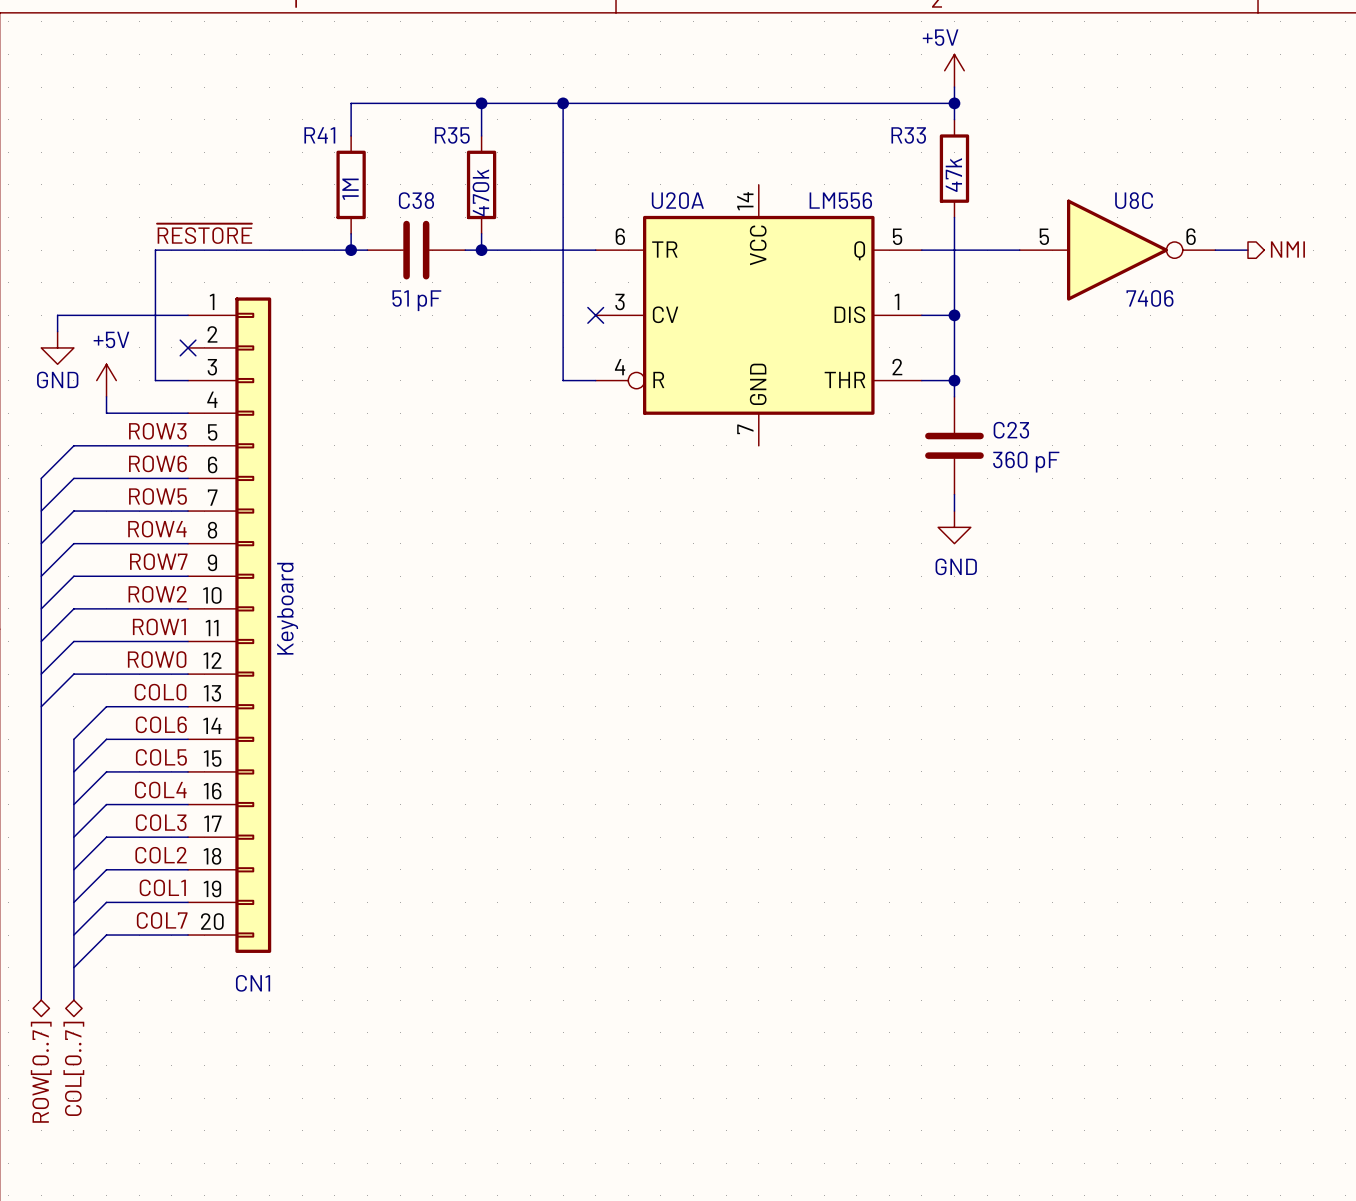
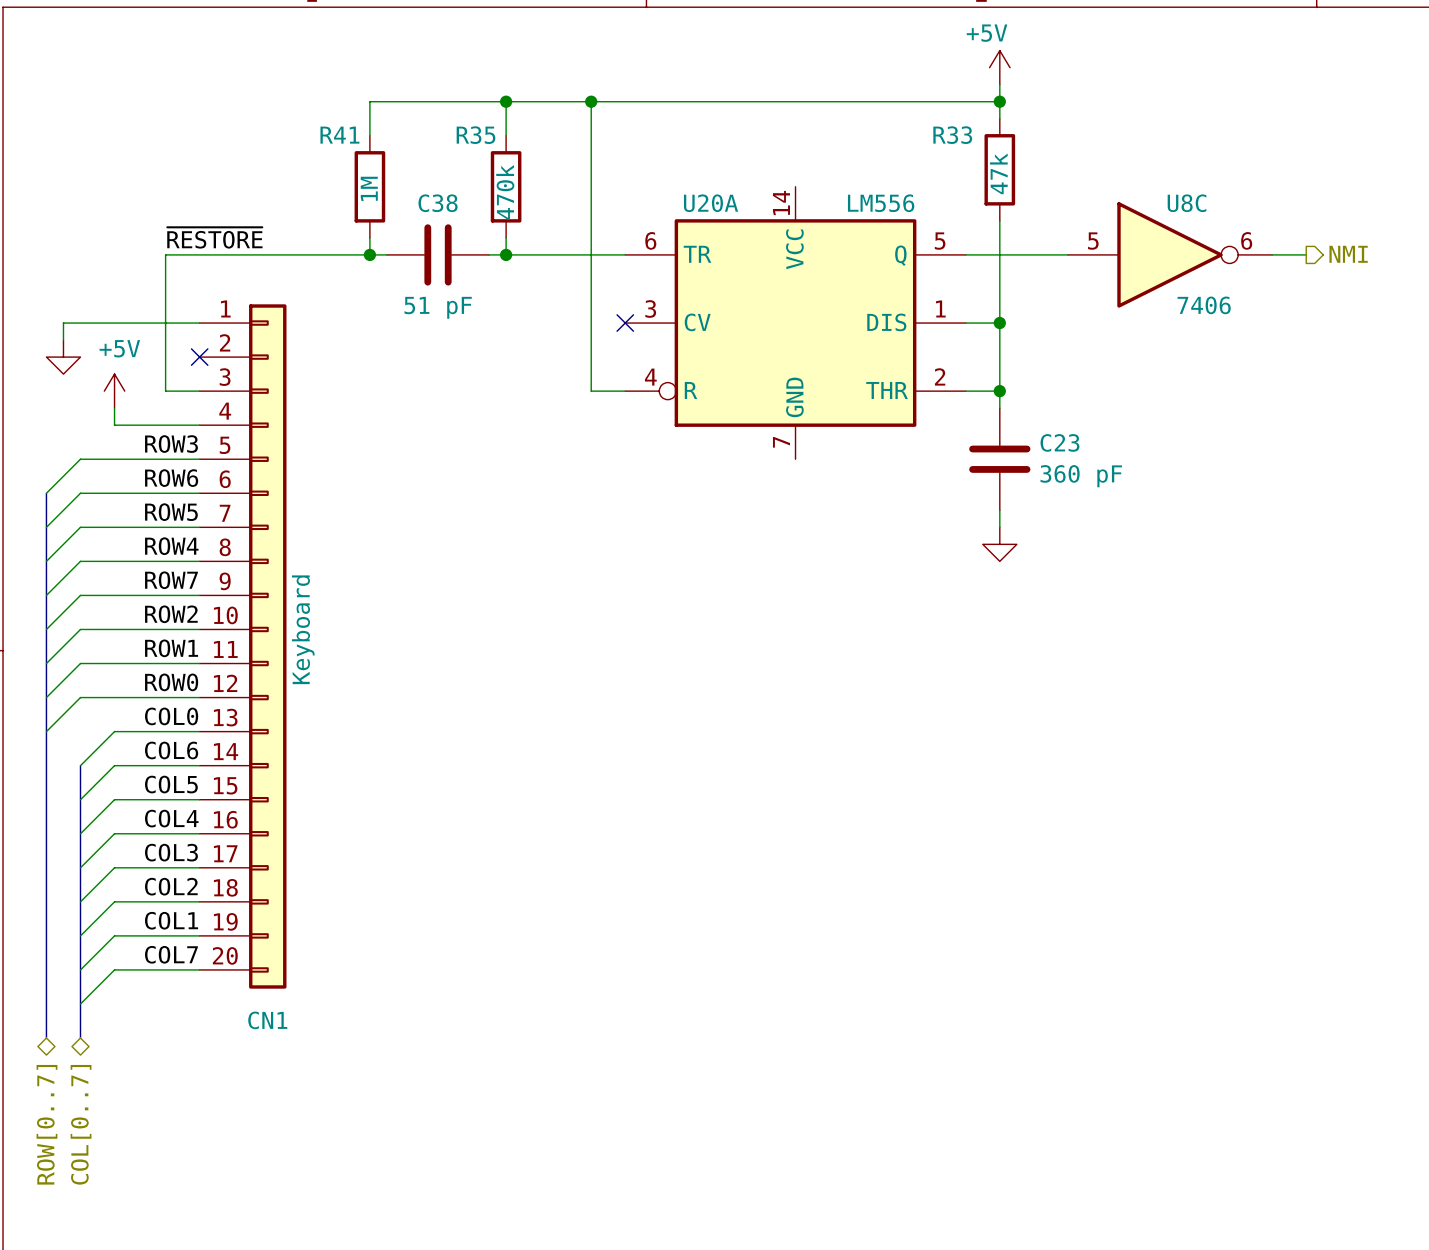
power symbol text: GND (57, 379) -> none
power symbol text: GND (956, 566) -> none

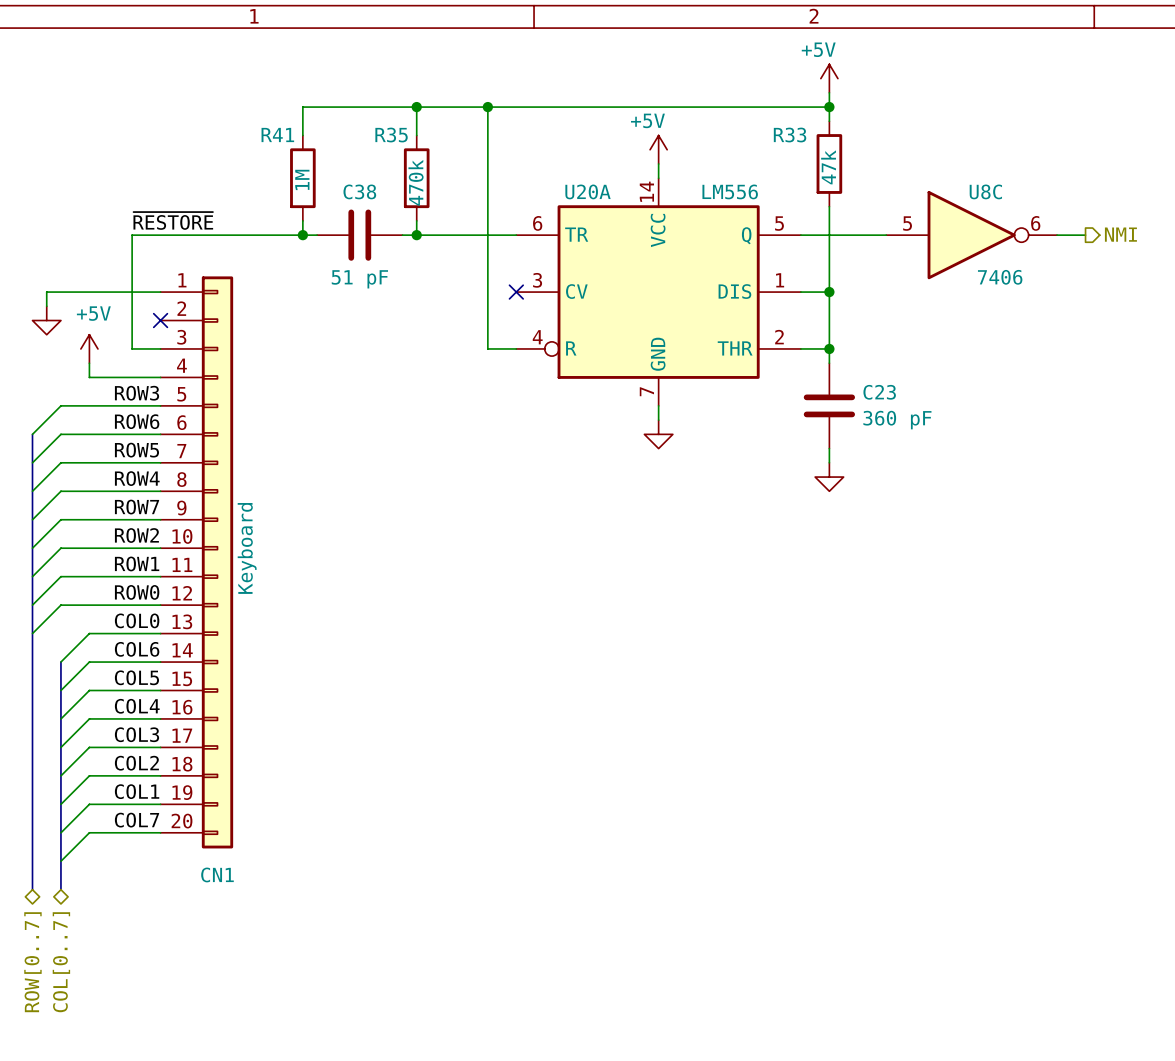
power symbol: none -> +5V (658, 149)
wire: none -> (658, 163) (658, 178)
wire: none -> (658, 405) (658, 420)
power symbol: none -> (658, 434)

